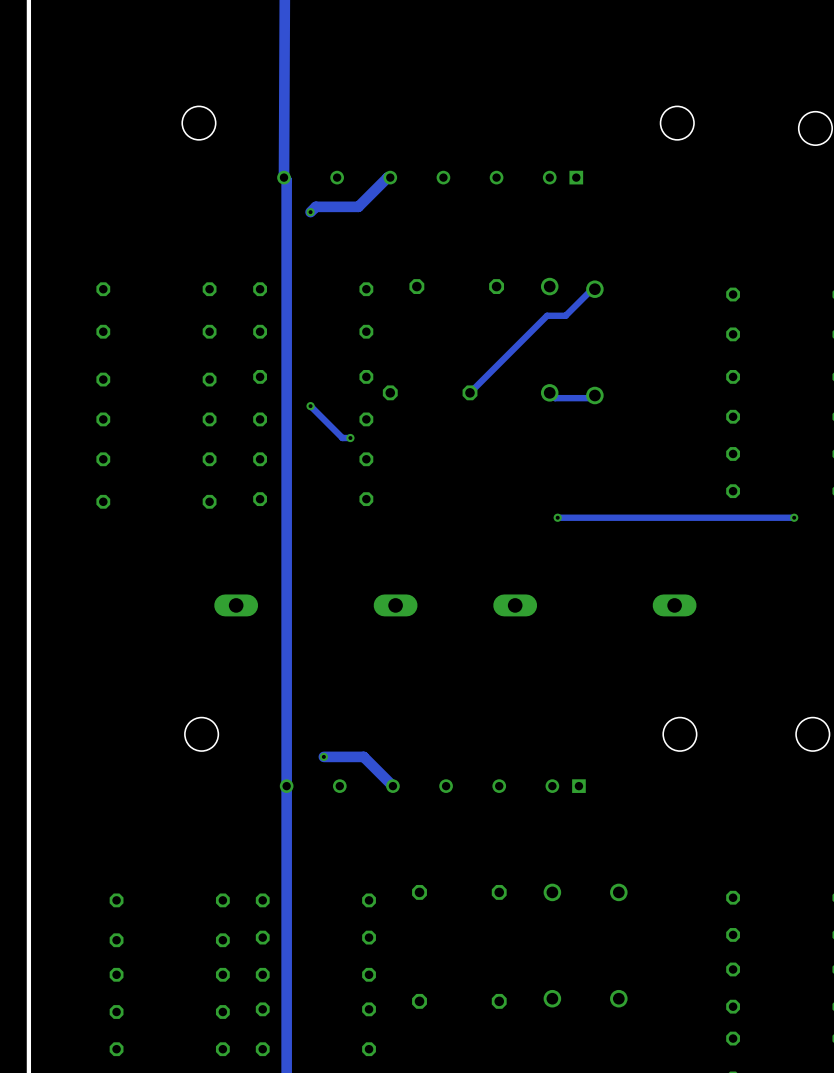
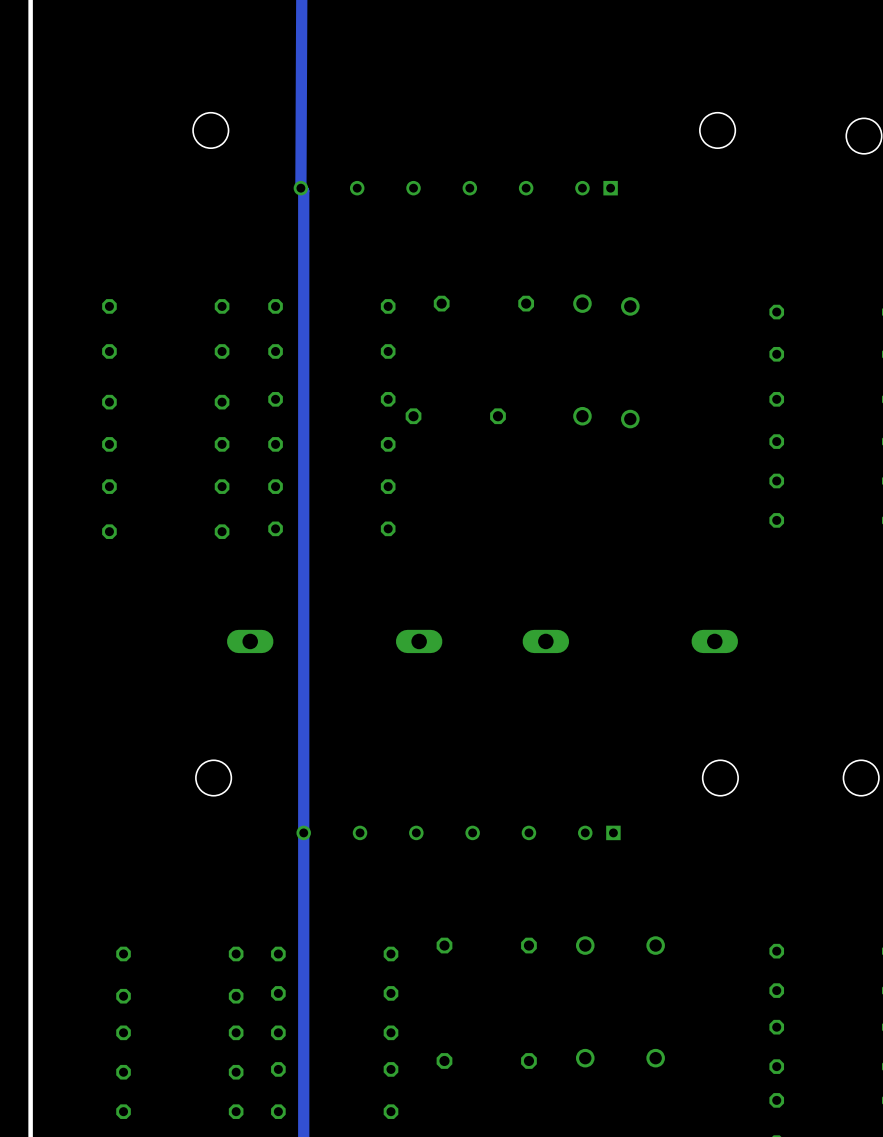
track: (390, 177) (387, 177) (358, 206) (315, 206) (310, 212) -> none
via: (310, 212) -> none
track: (594, 289) (592, 289) (565, 315) (547, 315) (470, 392) -> none
track: (549, 392) (555, 398) (592, 398) (594, 395) -> none
track: (310, 406) (342, 438) (350, 438) -> none
via: (310, 406) -> none
via: (350, 438) -> none
via: (557, 517) -> none
track: (794, 517) (557, 517) -> none
via: (794, 517) -> none
track: (323, 756) (363, 756) (392, 786) -> none
via: (323, 756) -> none

